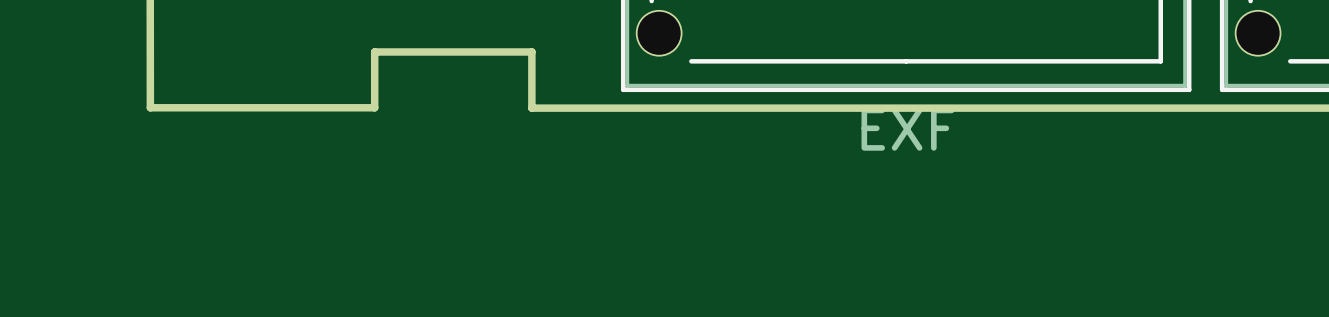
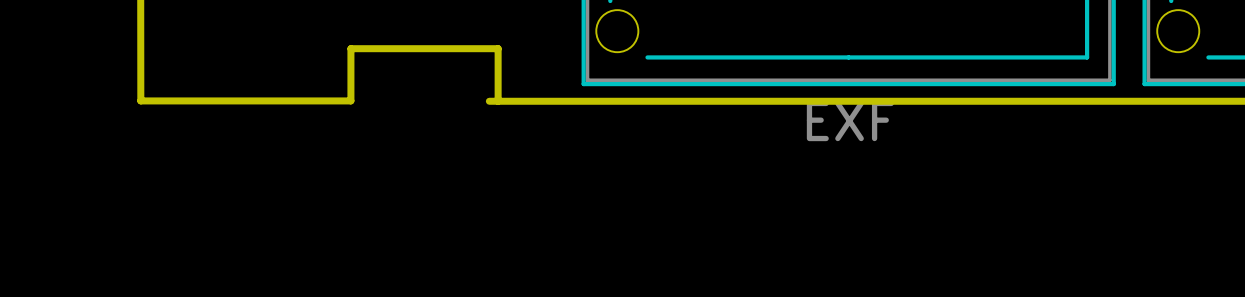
board edge: none -> (489, 101) (498, 101)

